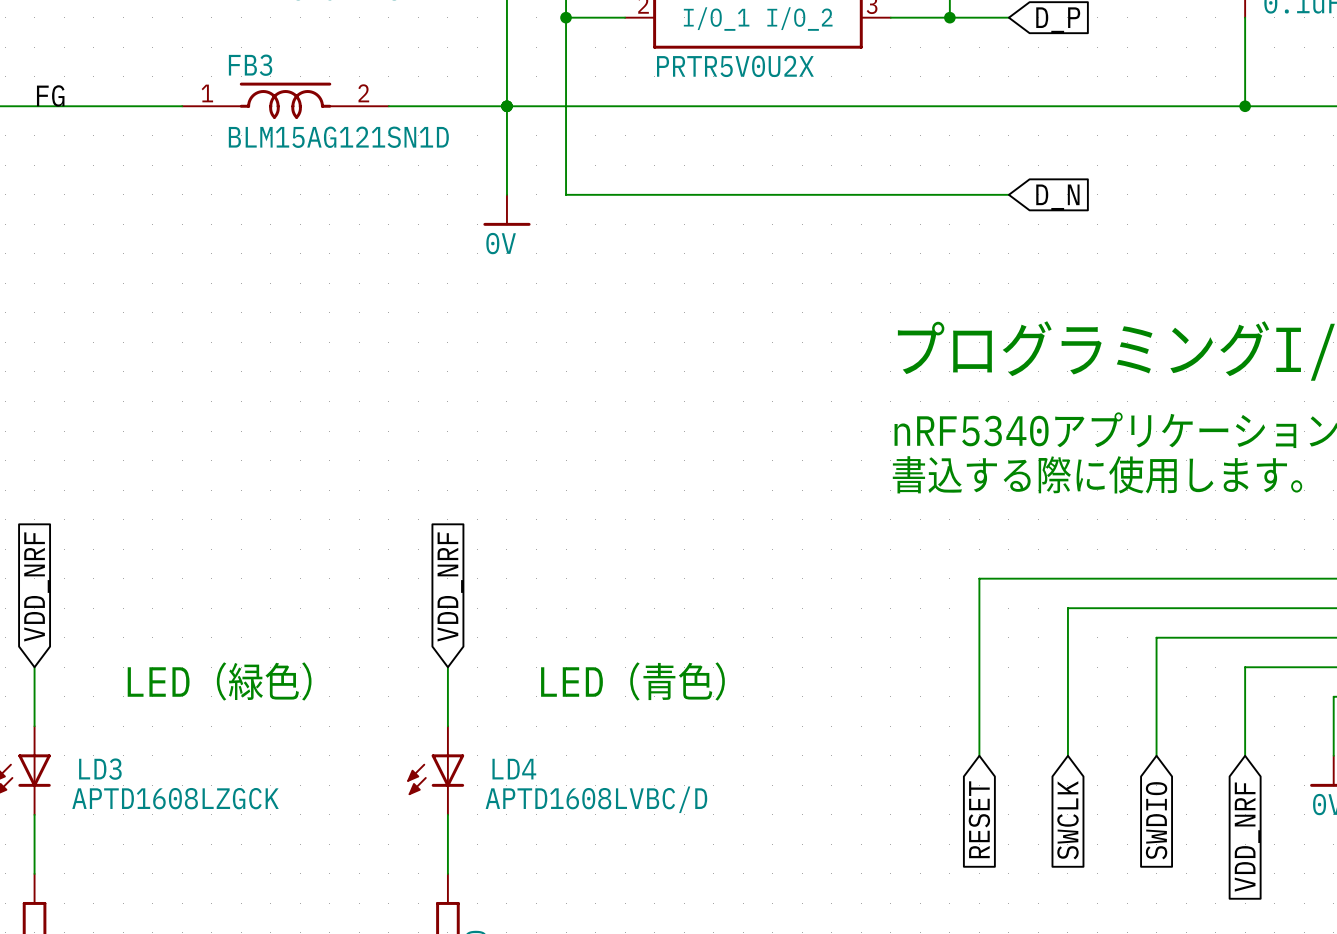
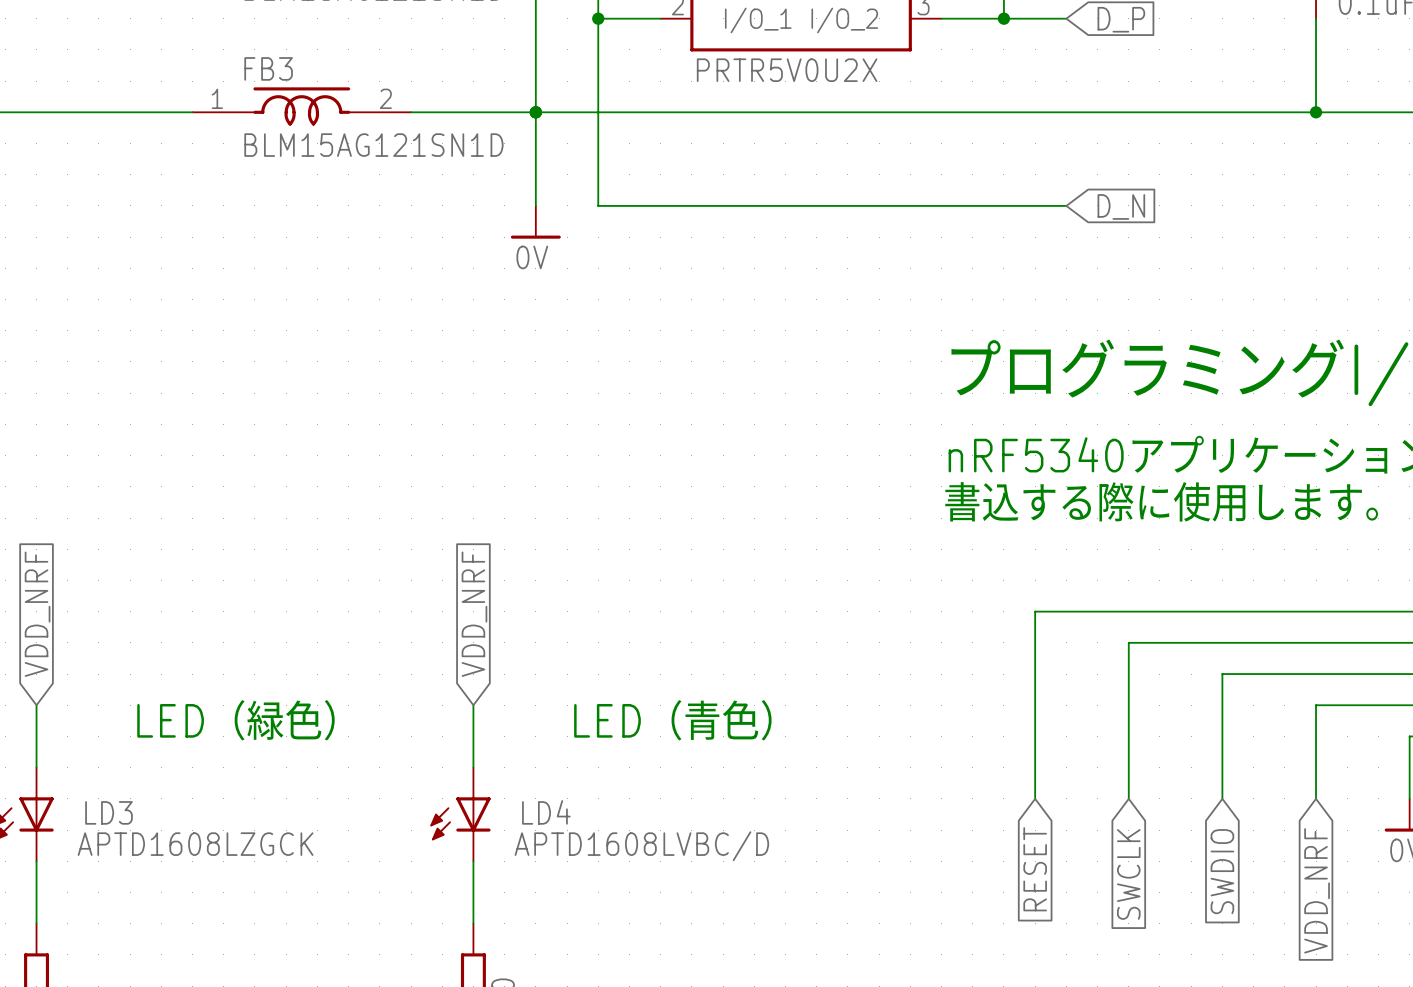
label: FG (50, 95) -> none

